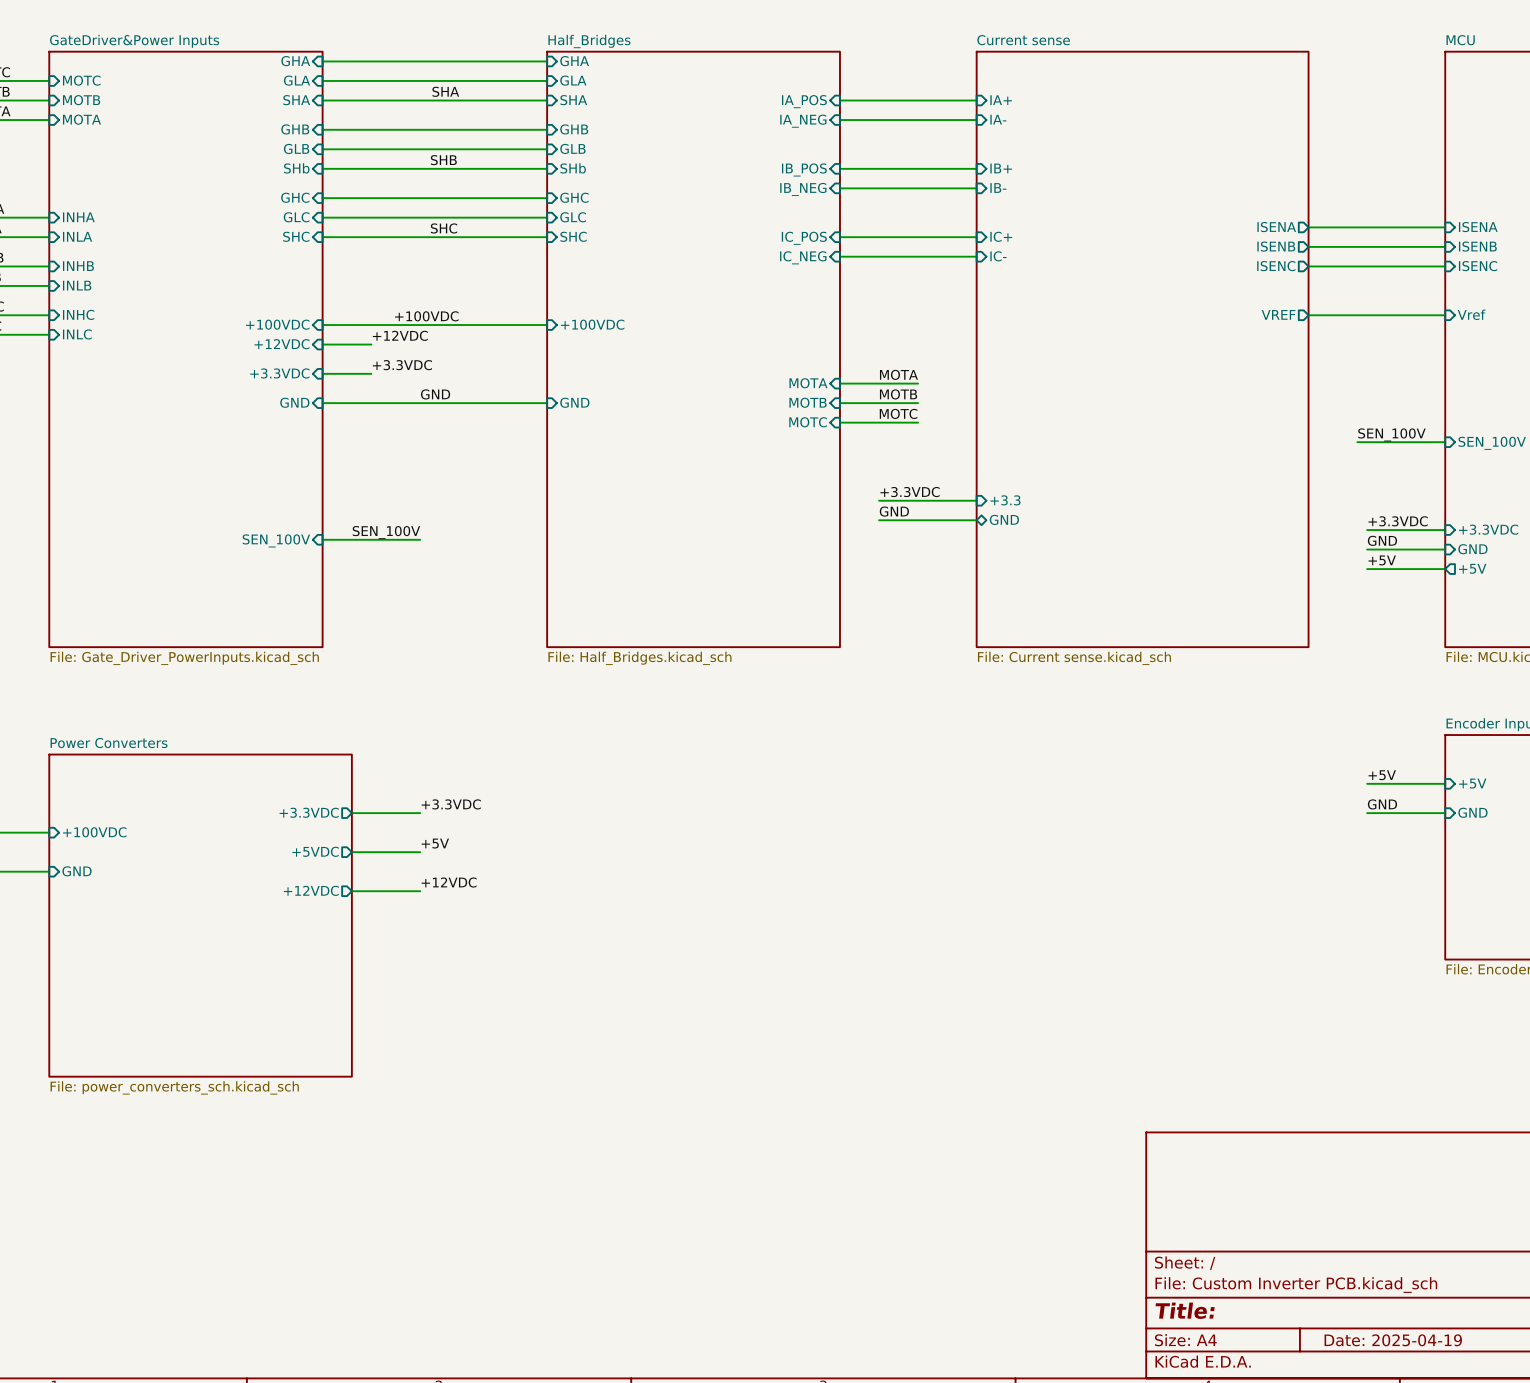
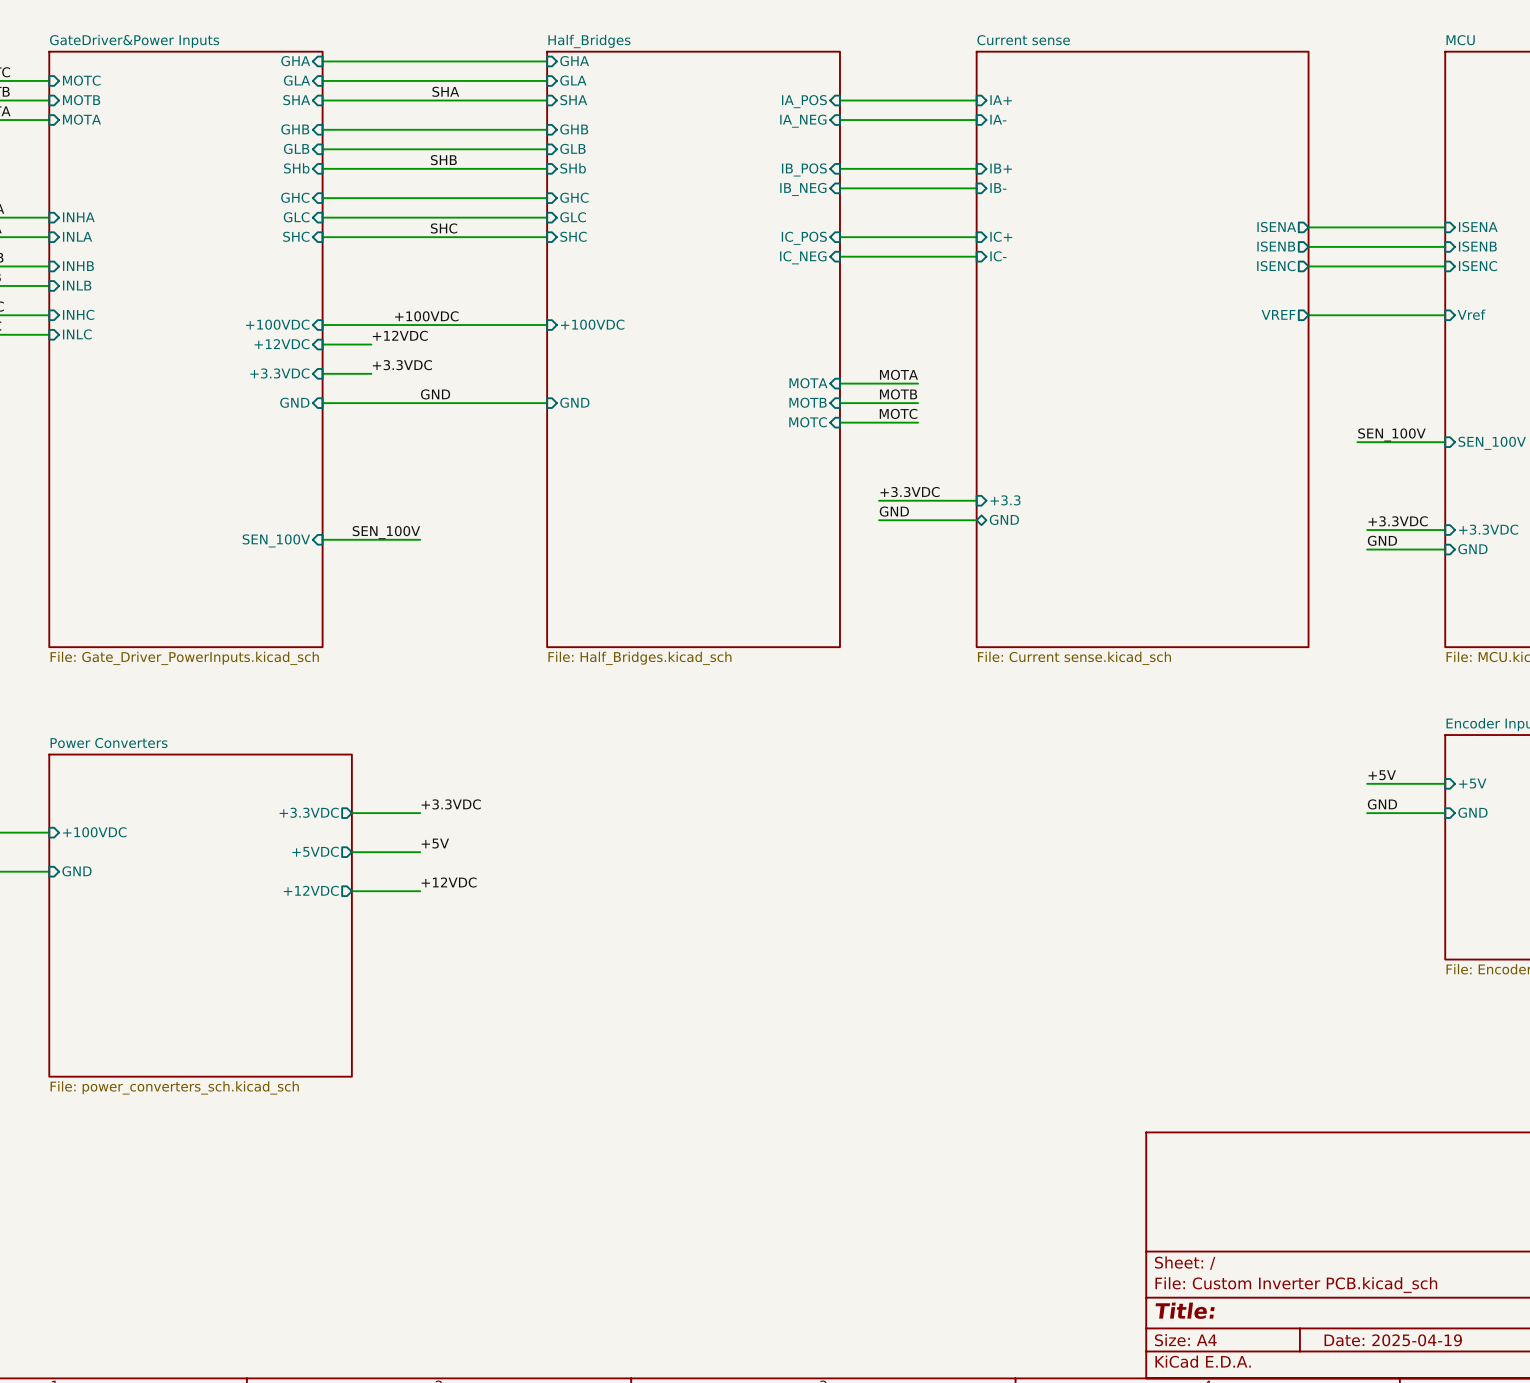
label: +5V (1382, 560) -> none
sheet pin: +5V (1472, 568) -> none
wire: (1367, 569) (1445, 569) -> none

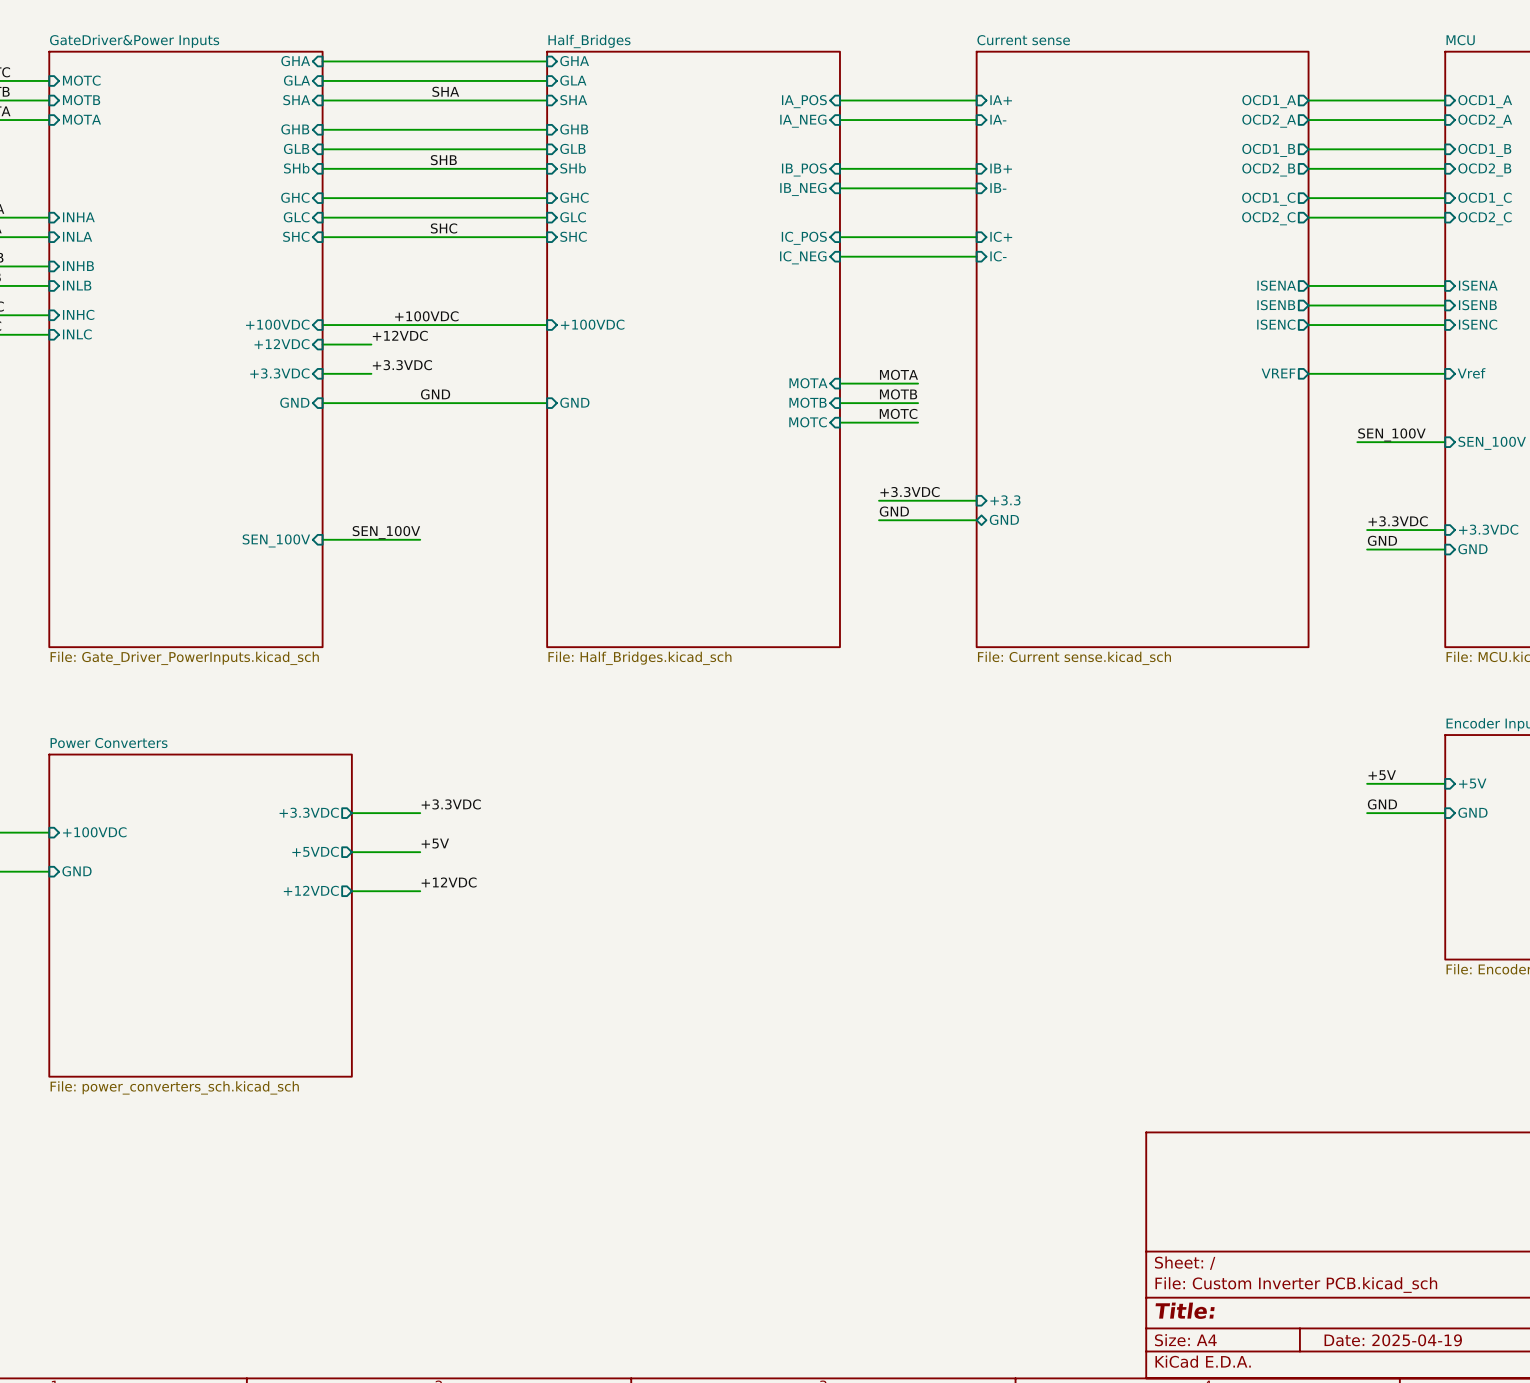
wire: none -> (1308, 100) (1445, 100)
sheet pin: none -> OCD1_A (1269, 101)
sheet pin: none -> OCD1_A (1485, 101)
wire: none -> (1308, 120) (1445, 120)
sheet pin: none -> OCD2_A (1269, 121)
sheet pin: none -> OCD2_A (1485, 121)
wire: none -> (1308, 149) (1445, 149)
sheet pin: none -> OCD1_B (1268, 150)
sheet pin: none -> OCD1_B (1484, 150)
wire: none -> (1308, 168) (1445, 168)
sheet pin: none -> OCD2_B (1268, 169)
sheet pin: none -> OCD2_B (1484, 169)
wire: none -> (1308, 198) (1445, 198)
sheet pin: none -> OCD1_C (1268, 199)
sheet pin: none -> OCD1_C (1485, 199)
wire: none -> (1308, 217) (1445, 217)
sheet pin: none -> OCD2_C (1268, 218)
sheet pin: none -> OCD2_C (1485, 218)
sheet pin position: ISENA (1276, 227) -> ISENA (1276, 285)
wire: (1308, 227) (1445, 227) -> (1308, 285) (1445, 285)
sheet pin position: ISENA (1478, 227) -> ISENA (1478, 285)
sheet pin position: ISENB (1276, 246) -> ISENB (1276, 305)
wire: (1308, 246) (1445, 246) -> (1308, 305) (1445, 305)
sheet pin position: ISENB (1477, 246) -> ISENB (1477, 305)
sheet pin position: ISENC (1276, 266) -> ISENC (1276, 324)
wire: (1308, 266) (1445, 266) -> (1308, 325) (1445, 325)
sheet pin position: ISENC (1478, 266) -> ISENC (1478, 324)
sheet pin position: VREF (1278, 314) -> VREF (1278, 373)
sheet pin position: Vref (1471, 314) -> Vref (1471, 373)
wire: (1308, 315) (1445, 315) -> (1308, 373) (1445, 373)

